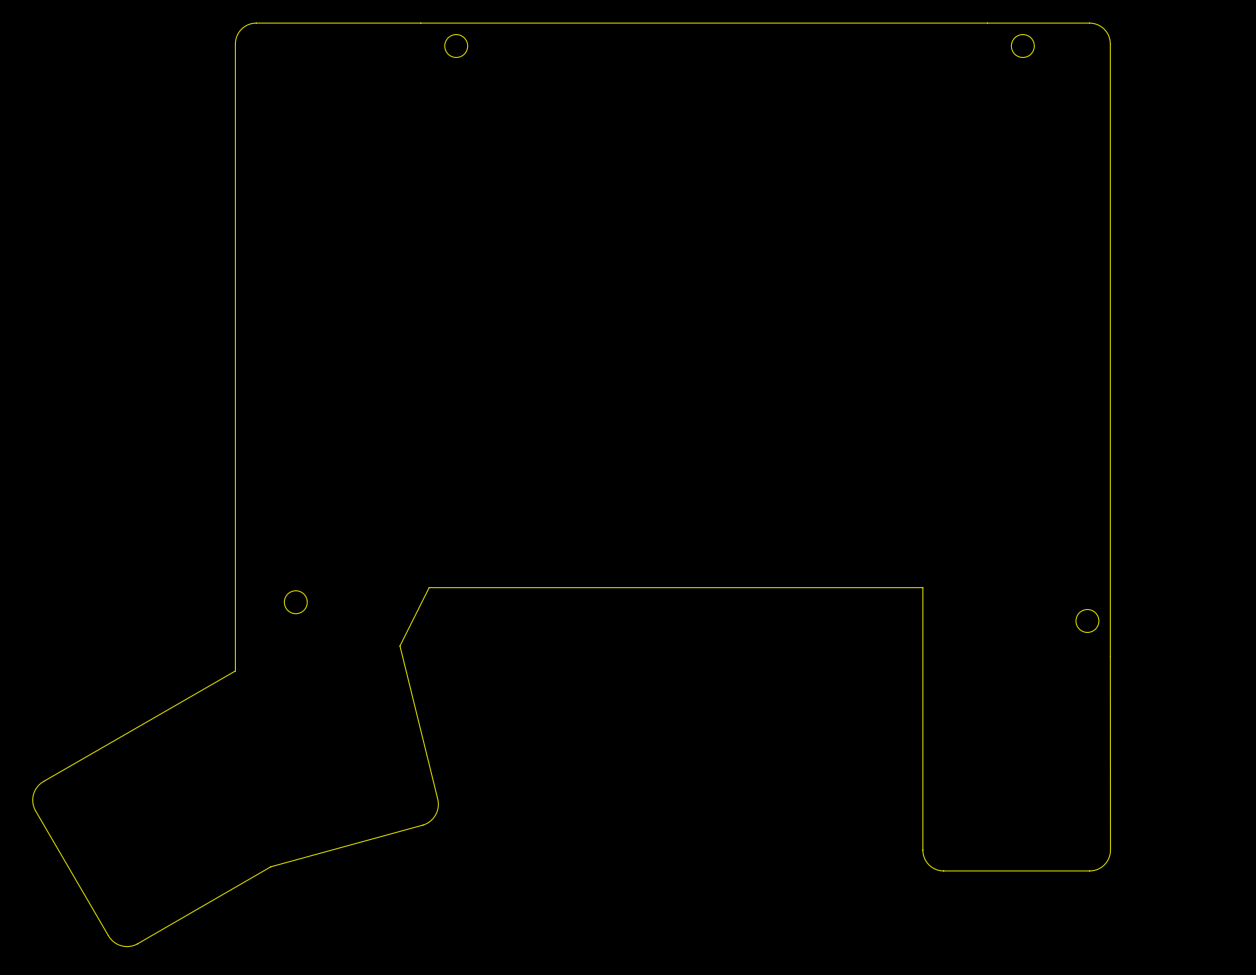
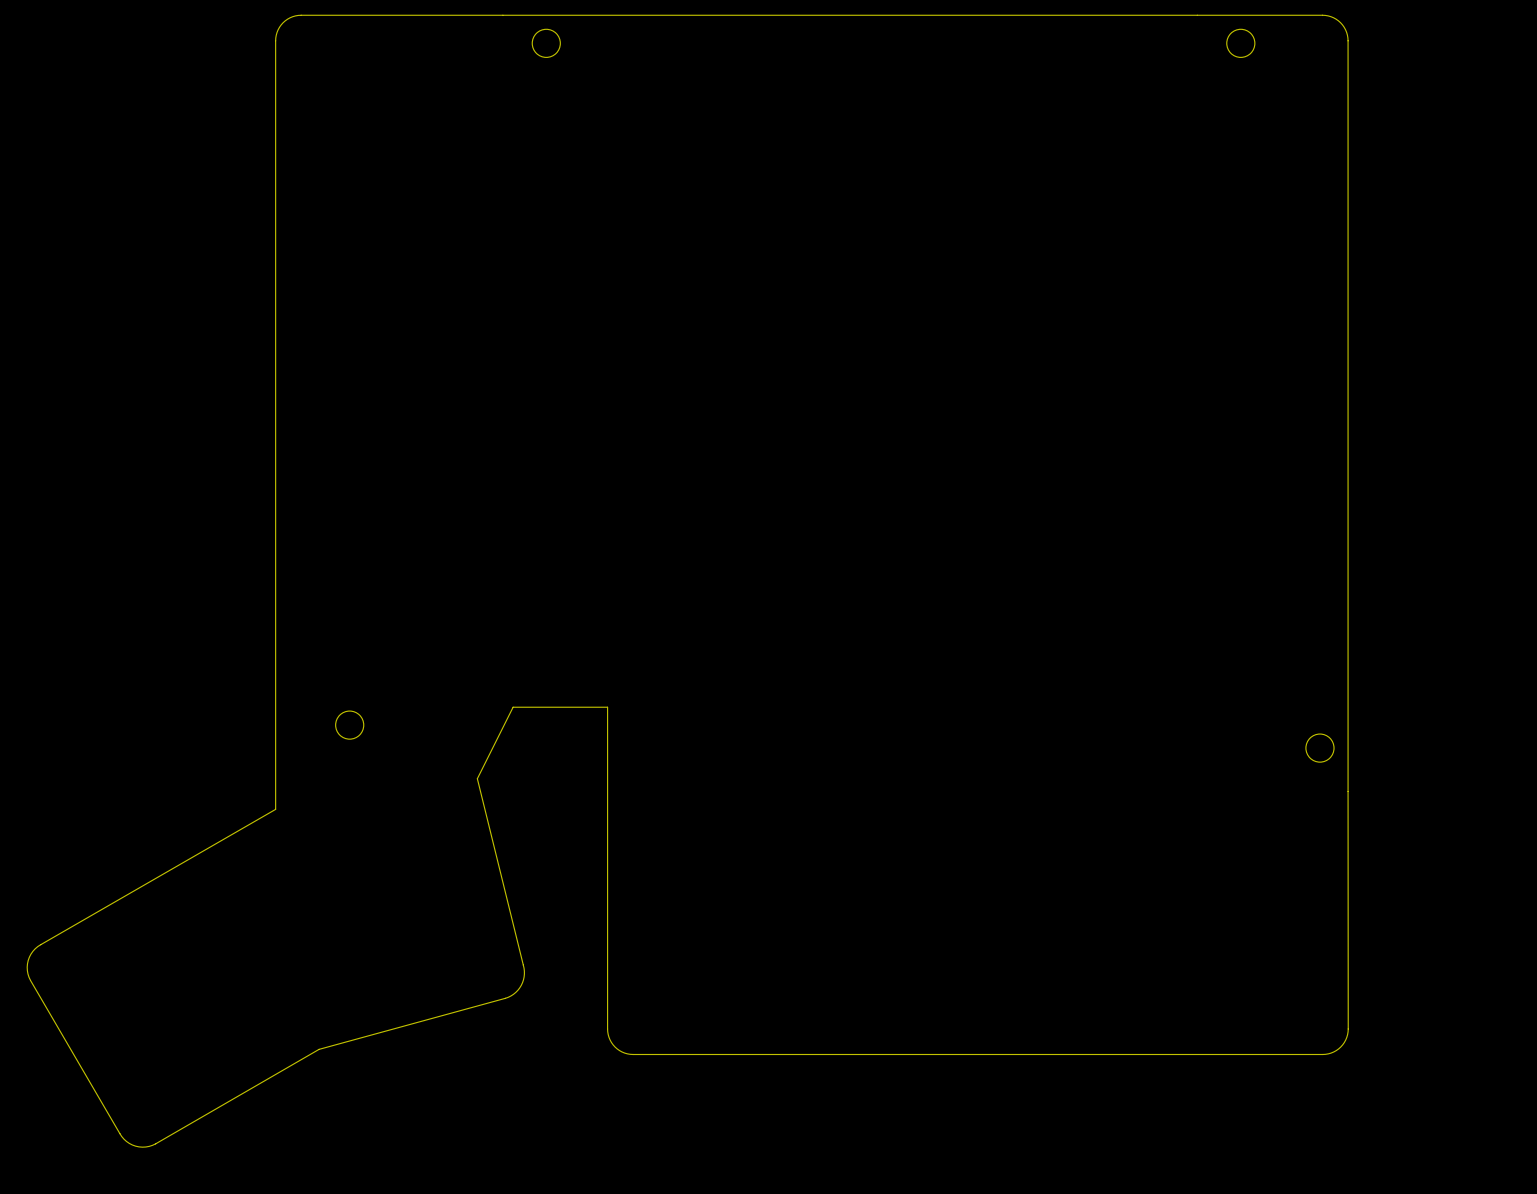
board edge: (506, 587) (922, 587) (922, 852) (928, 864) (936, 869) (943, 870) -> (607, 707) (607, 1028) (611, 1042) (619, 1050) (633, 1054) (1143, 1054)

